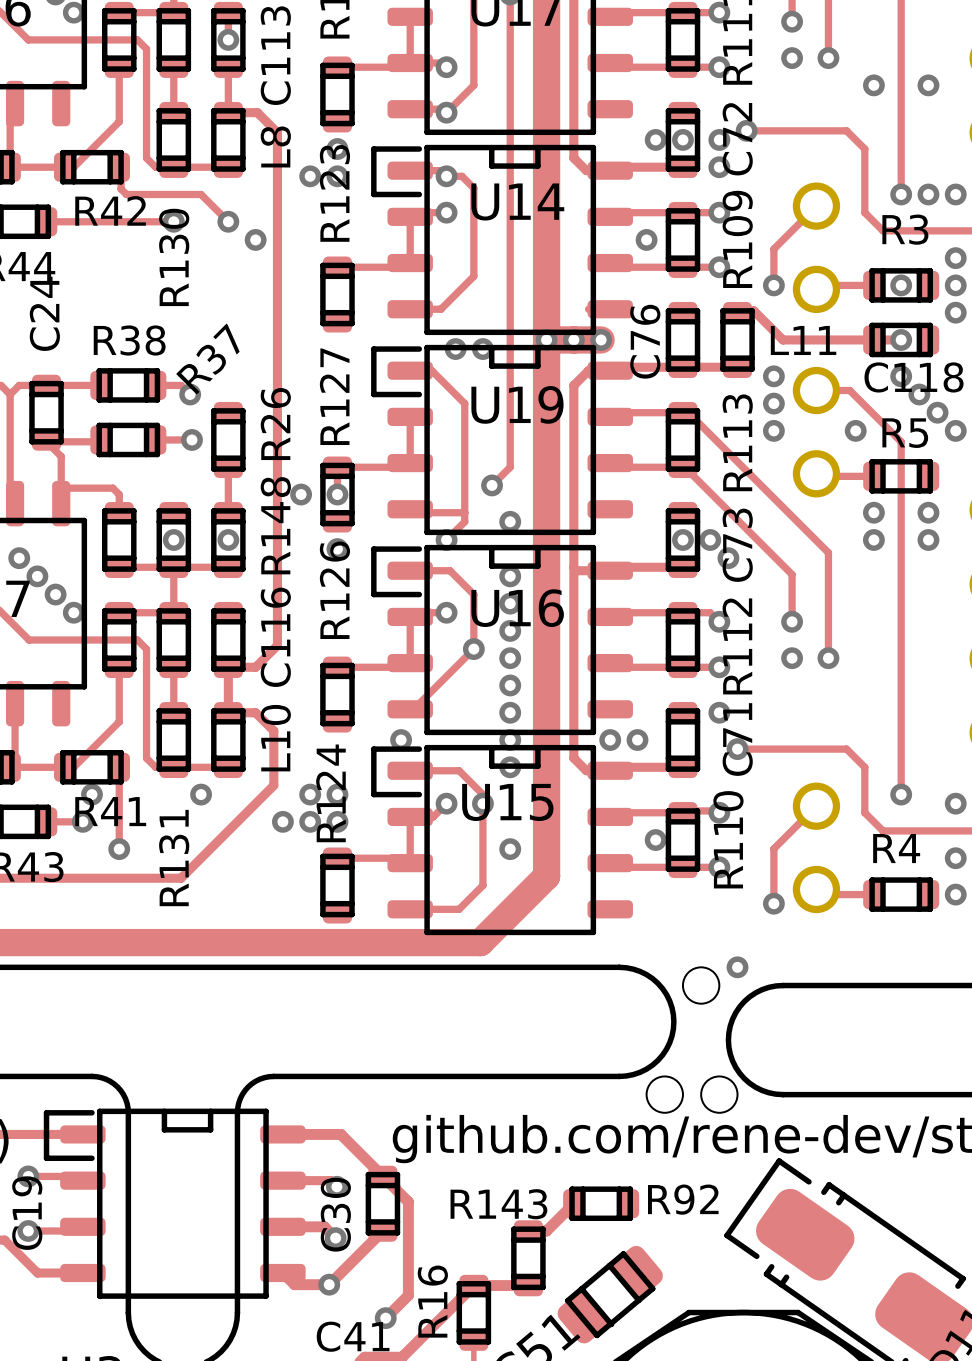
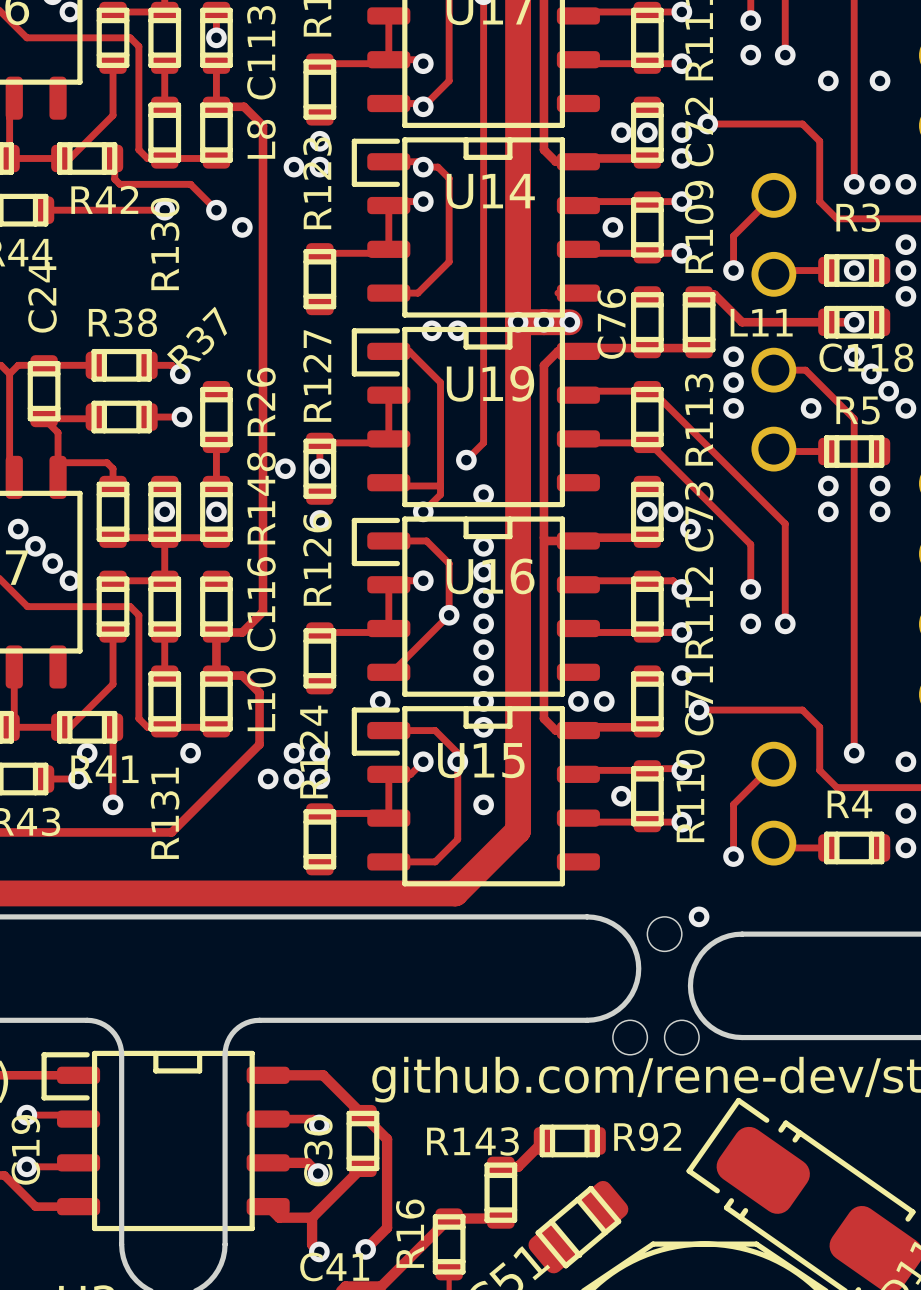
track: none -> (312, 1217) (312, 1244) (319, 1251)
via position: (329, 1284) -> (319, 1251)

